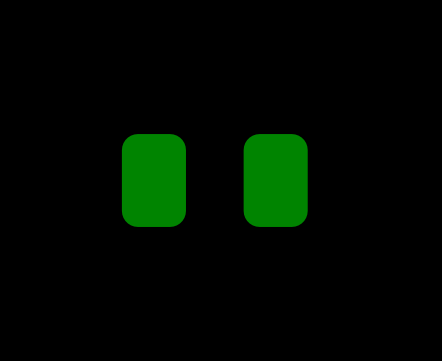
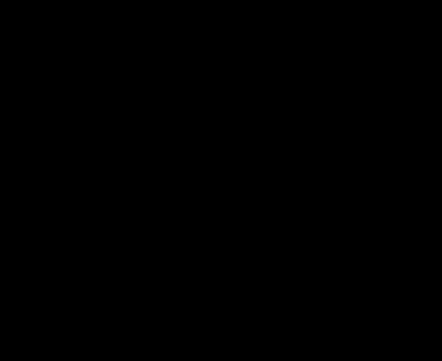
part: (214, 180) -> none

